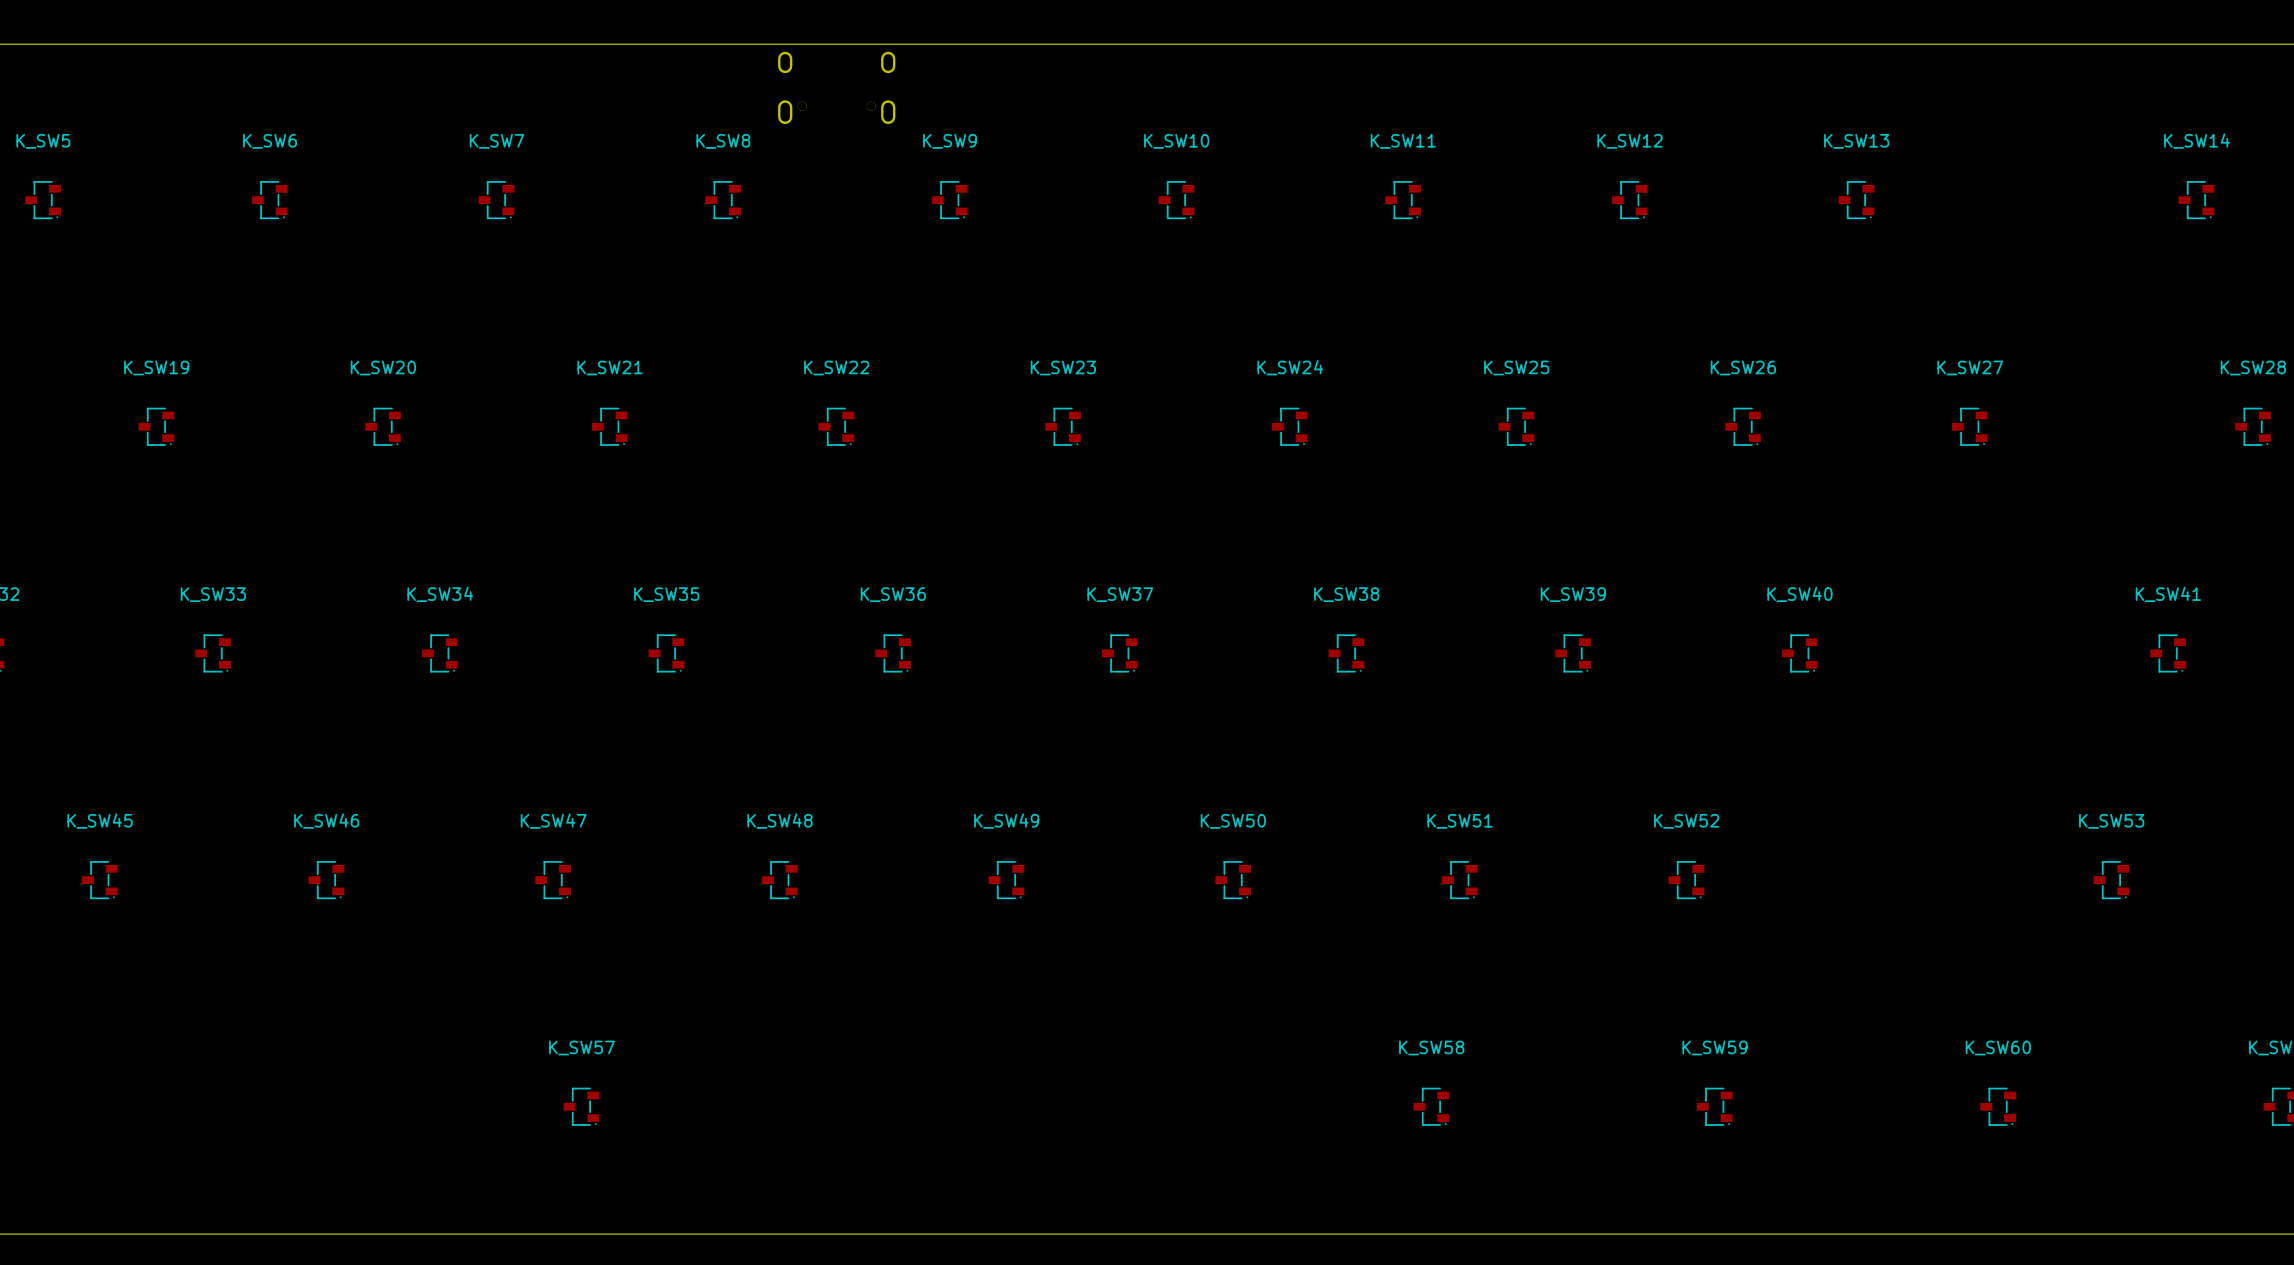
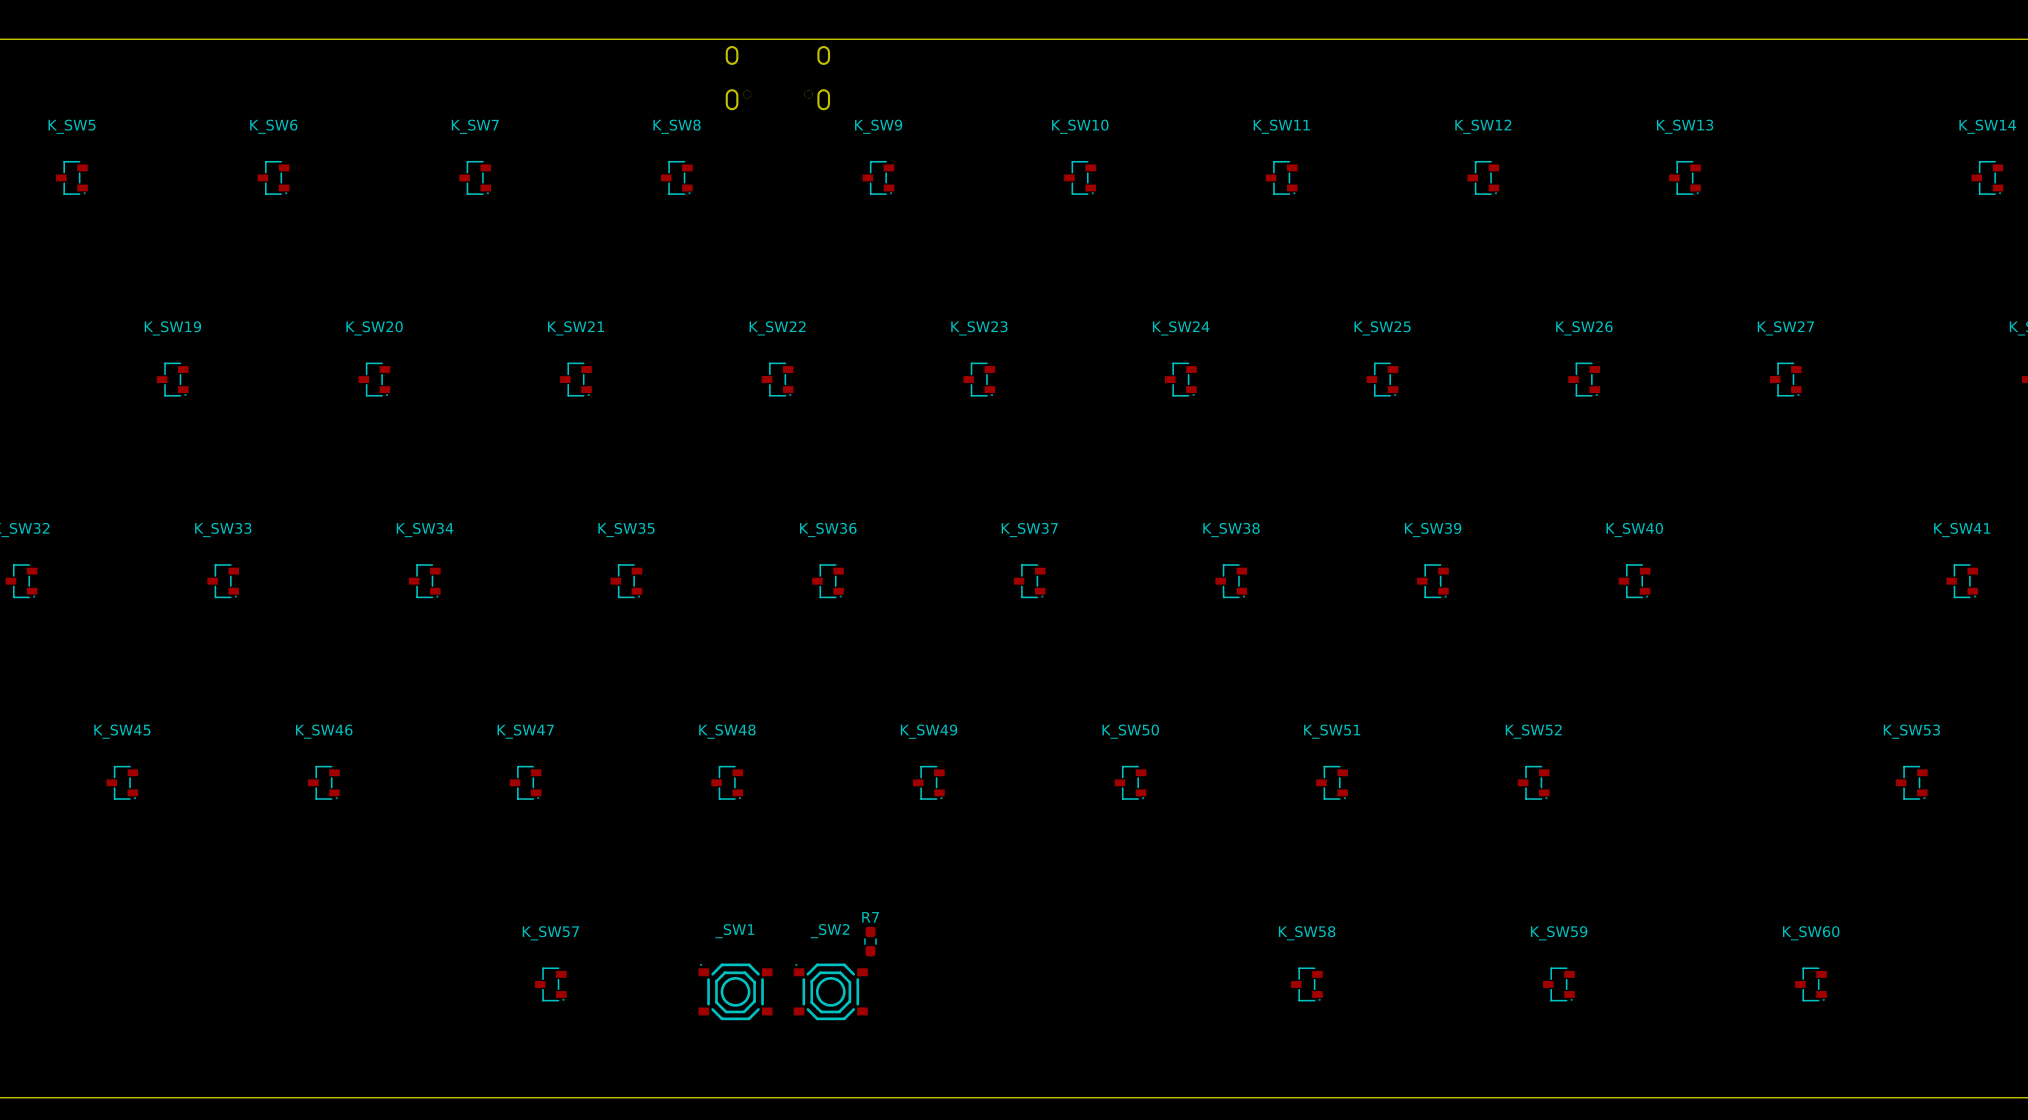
R7: none -> (870, 941)
_SW1: none -> (735, 991)
_SW2: none -> (830, 991)

